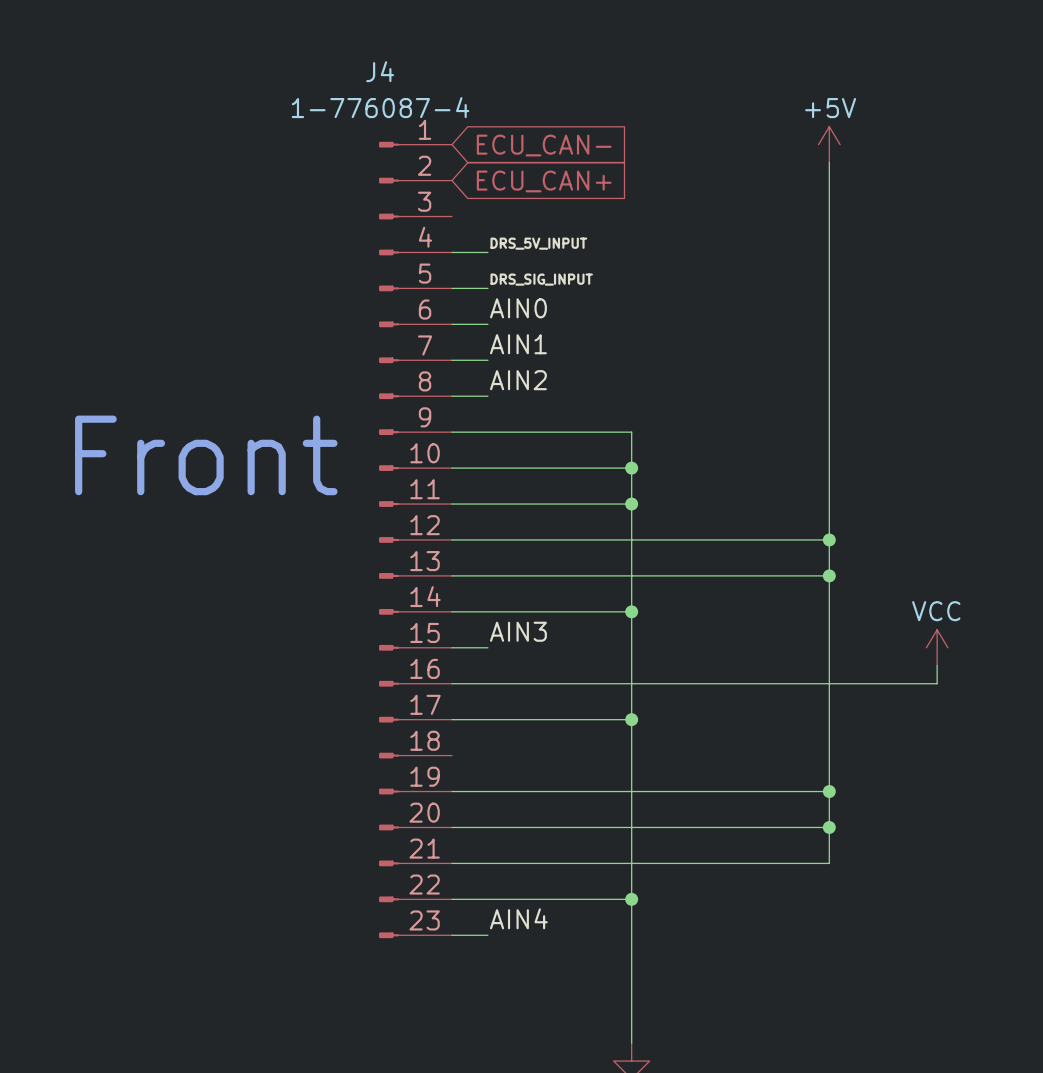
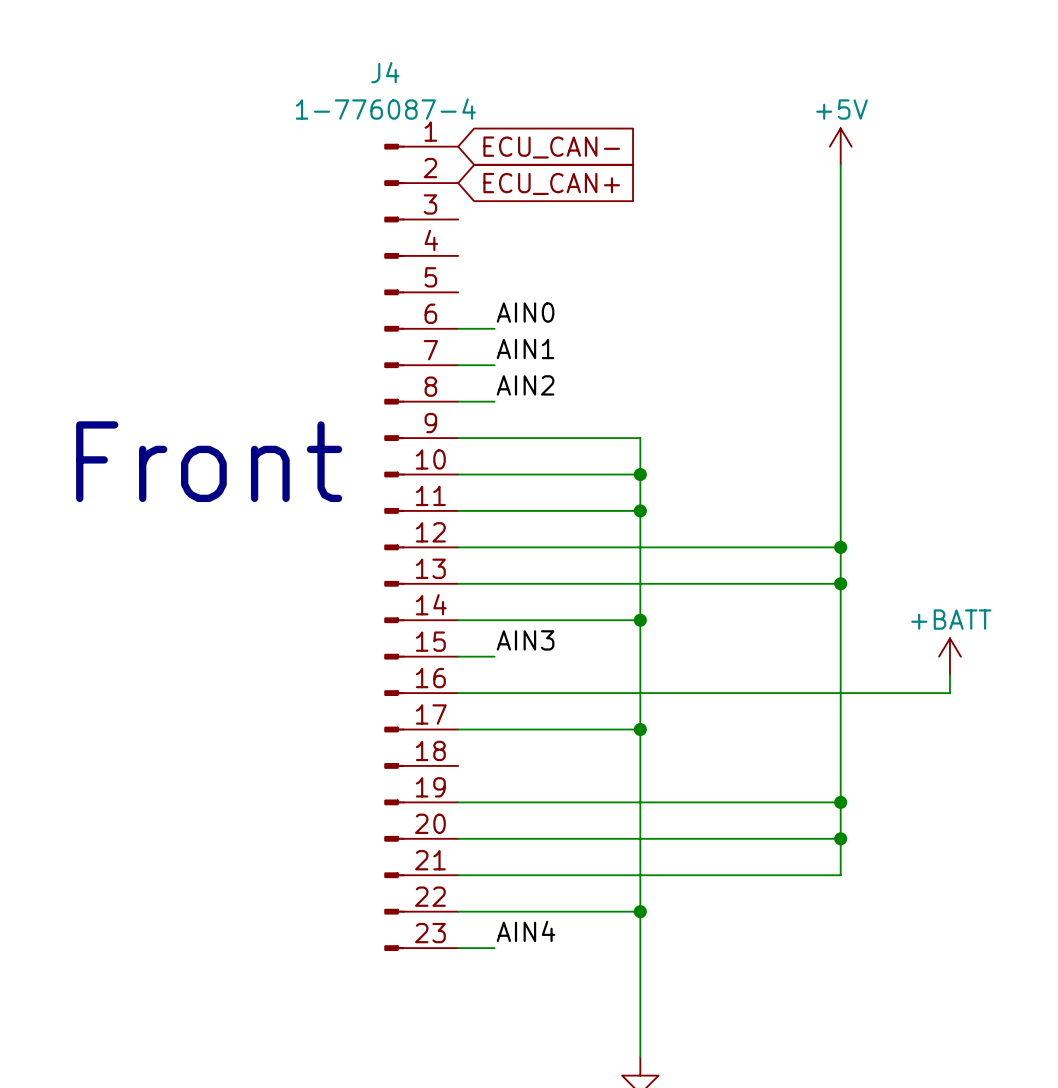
label: DRS_5V_INPUT (538, 243) -> none
wire: (451, 252) (487, 252) -> none
label: DRS_SIG_INPUT (541, 279) -> none
wire: (451, 288) (487, 288) -> none
power symbol: VCC (937, 647) -> +BATT (949, 656)

